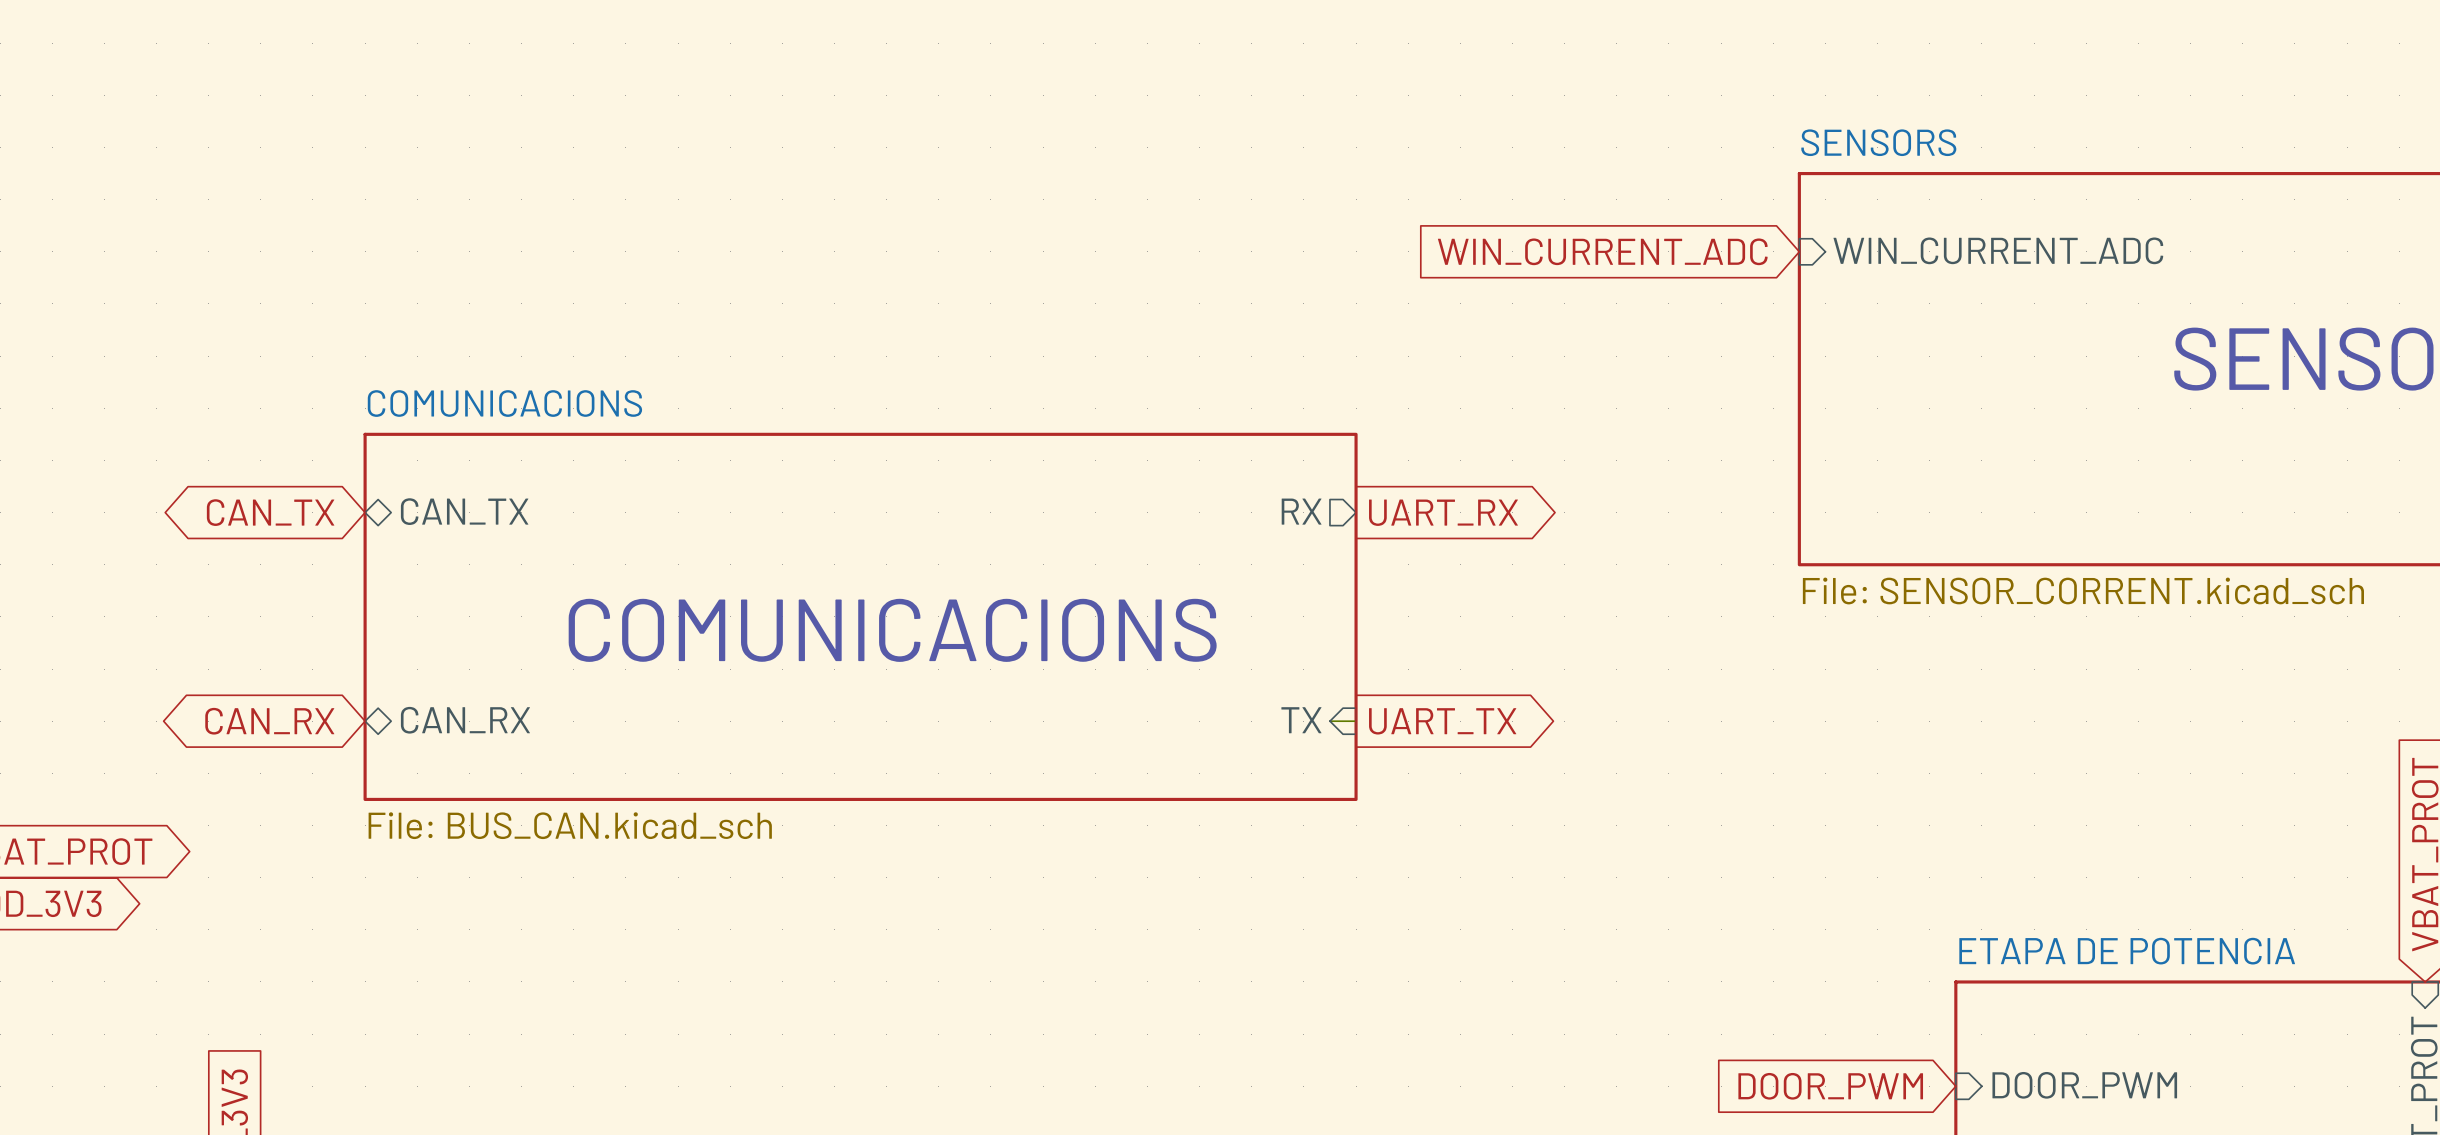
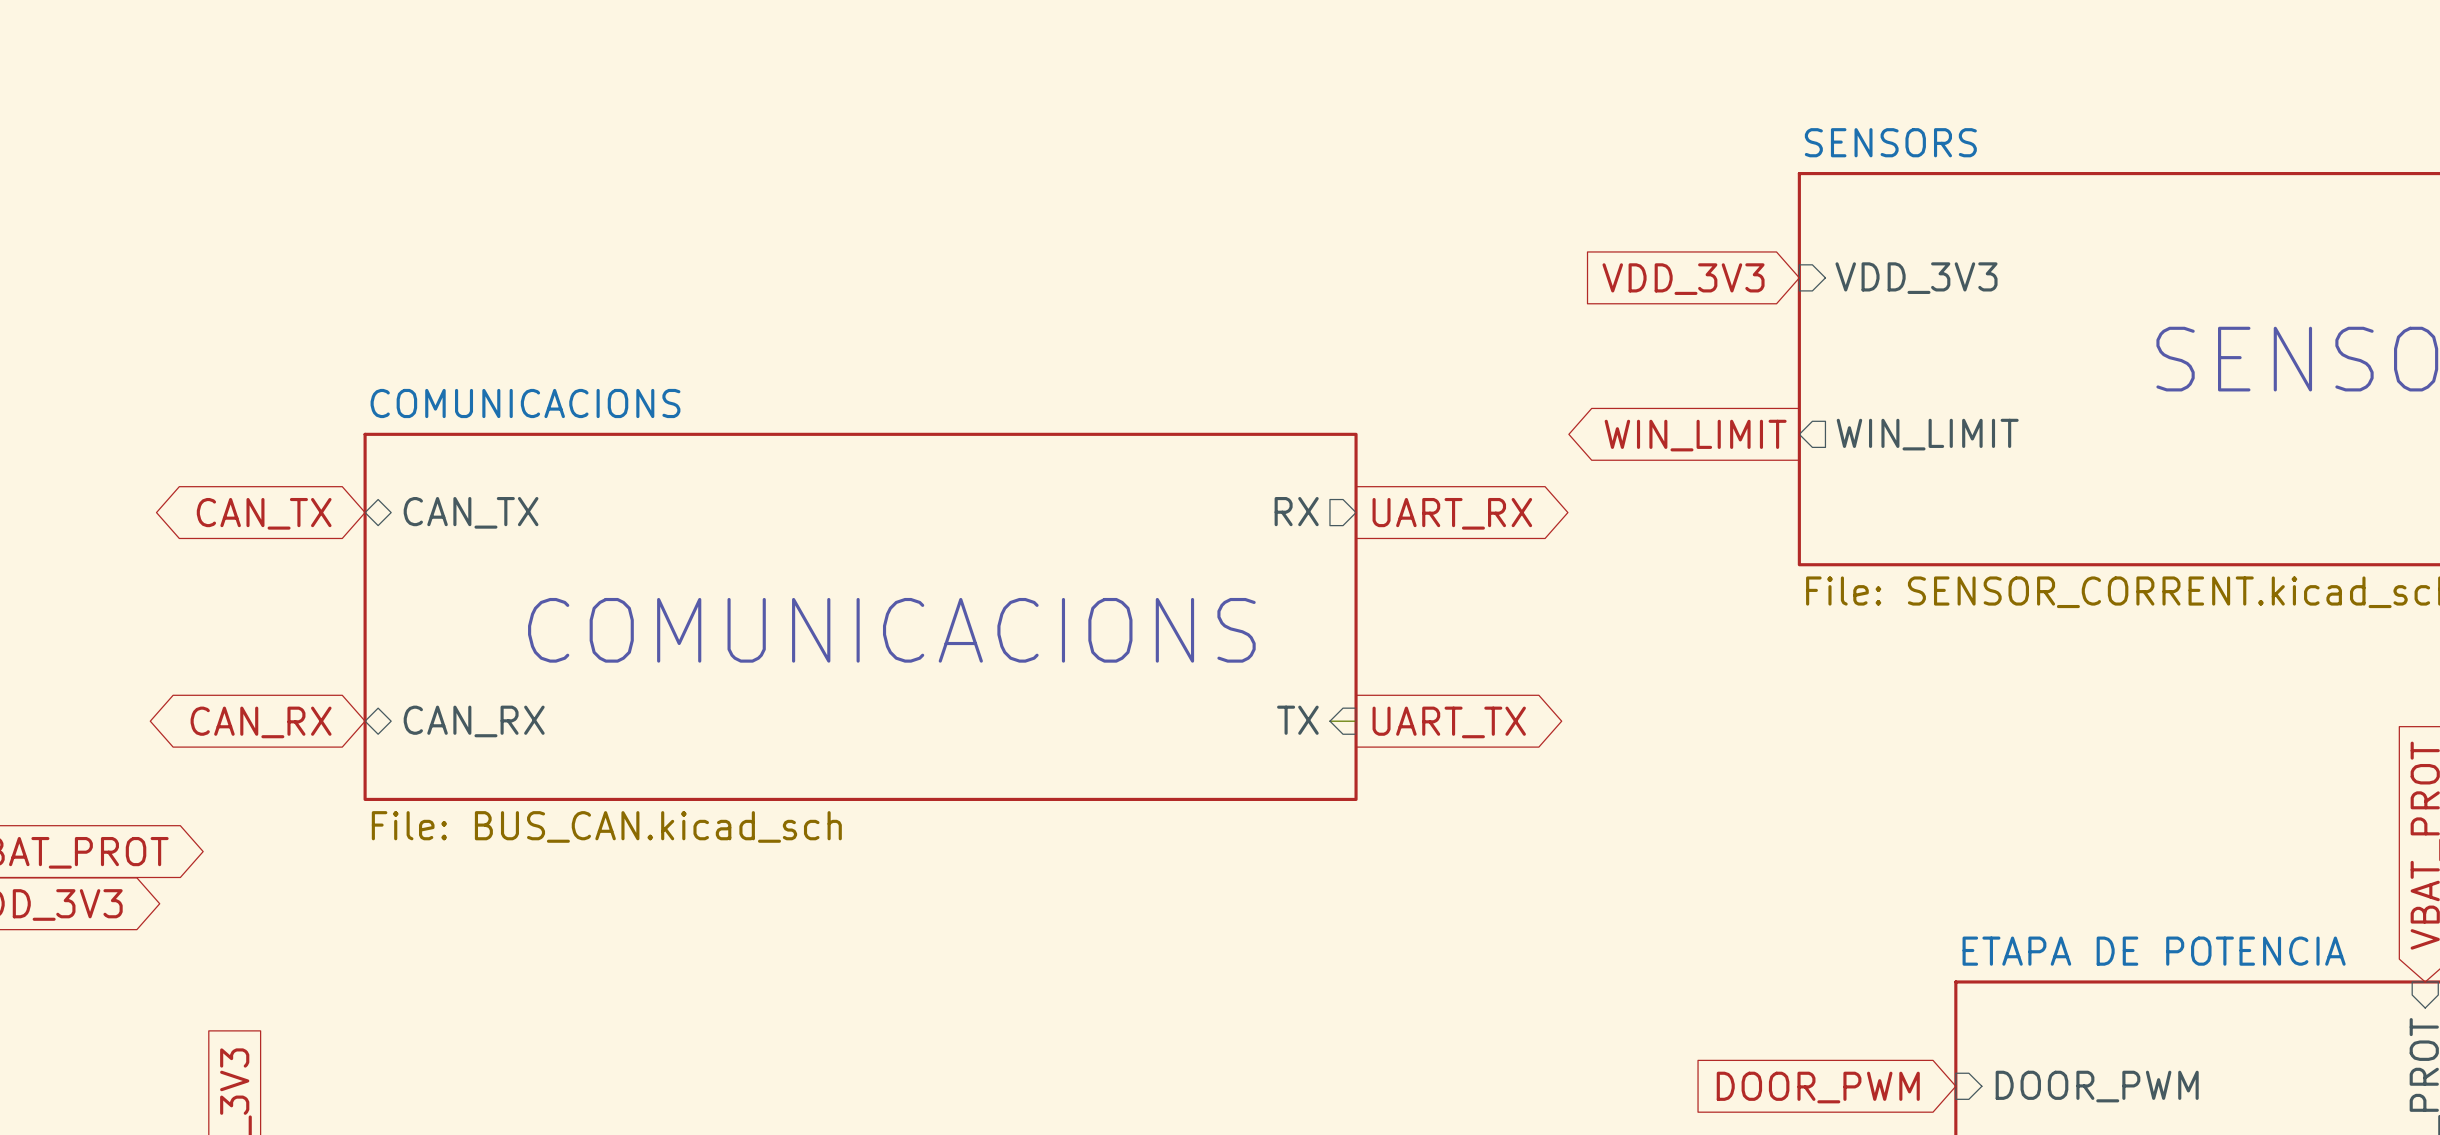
sheet pin: WIN_CURRENT_ADC (1998, 250) -> none
global label: WIN_CURRENT_ADC (1602, 251) -> none
sheet pin: none -> VDD_3V3 (1916, 278)
global label: none -> VDD_3V3 (1683, 279)
sheet pin: none -> WIN_LIMIT (1927, 434)
global label: none -> WIN_LIMIT (1695, 435)

